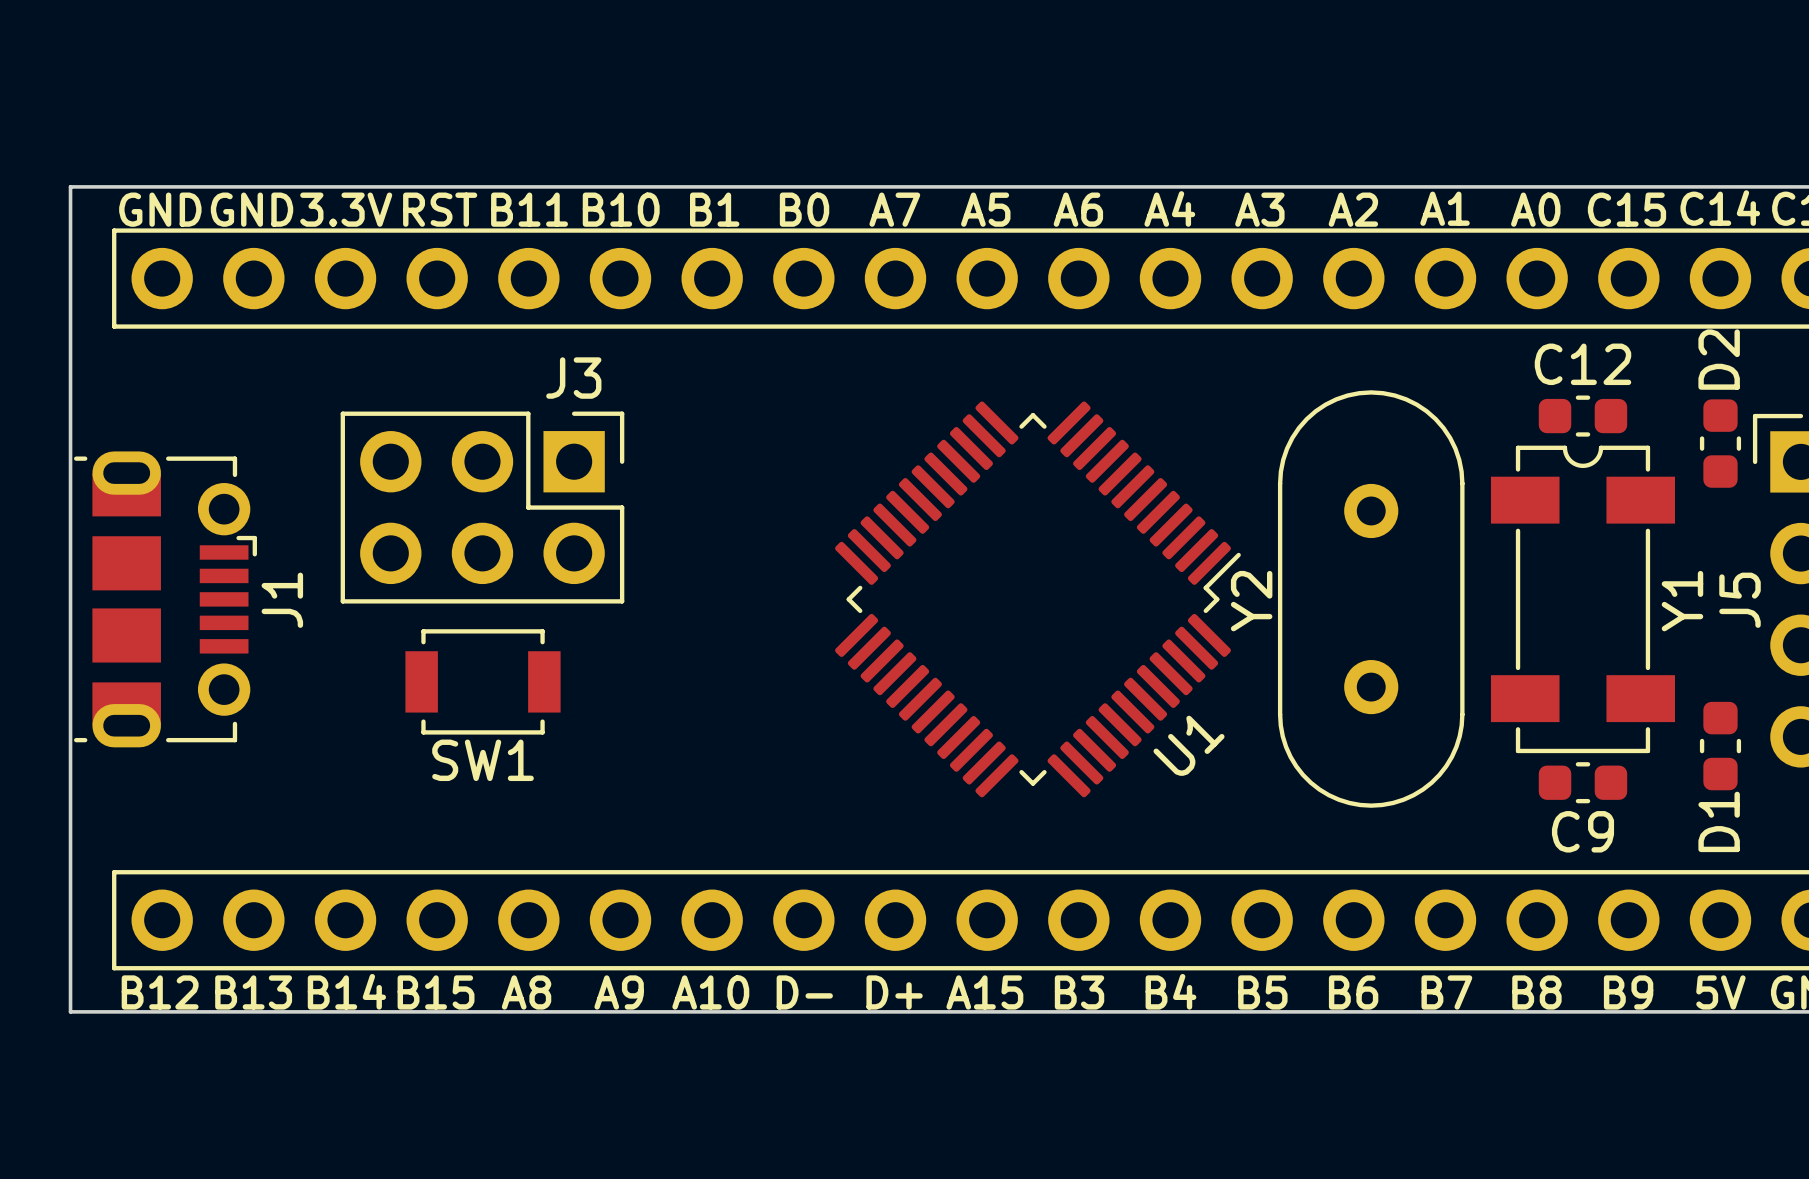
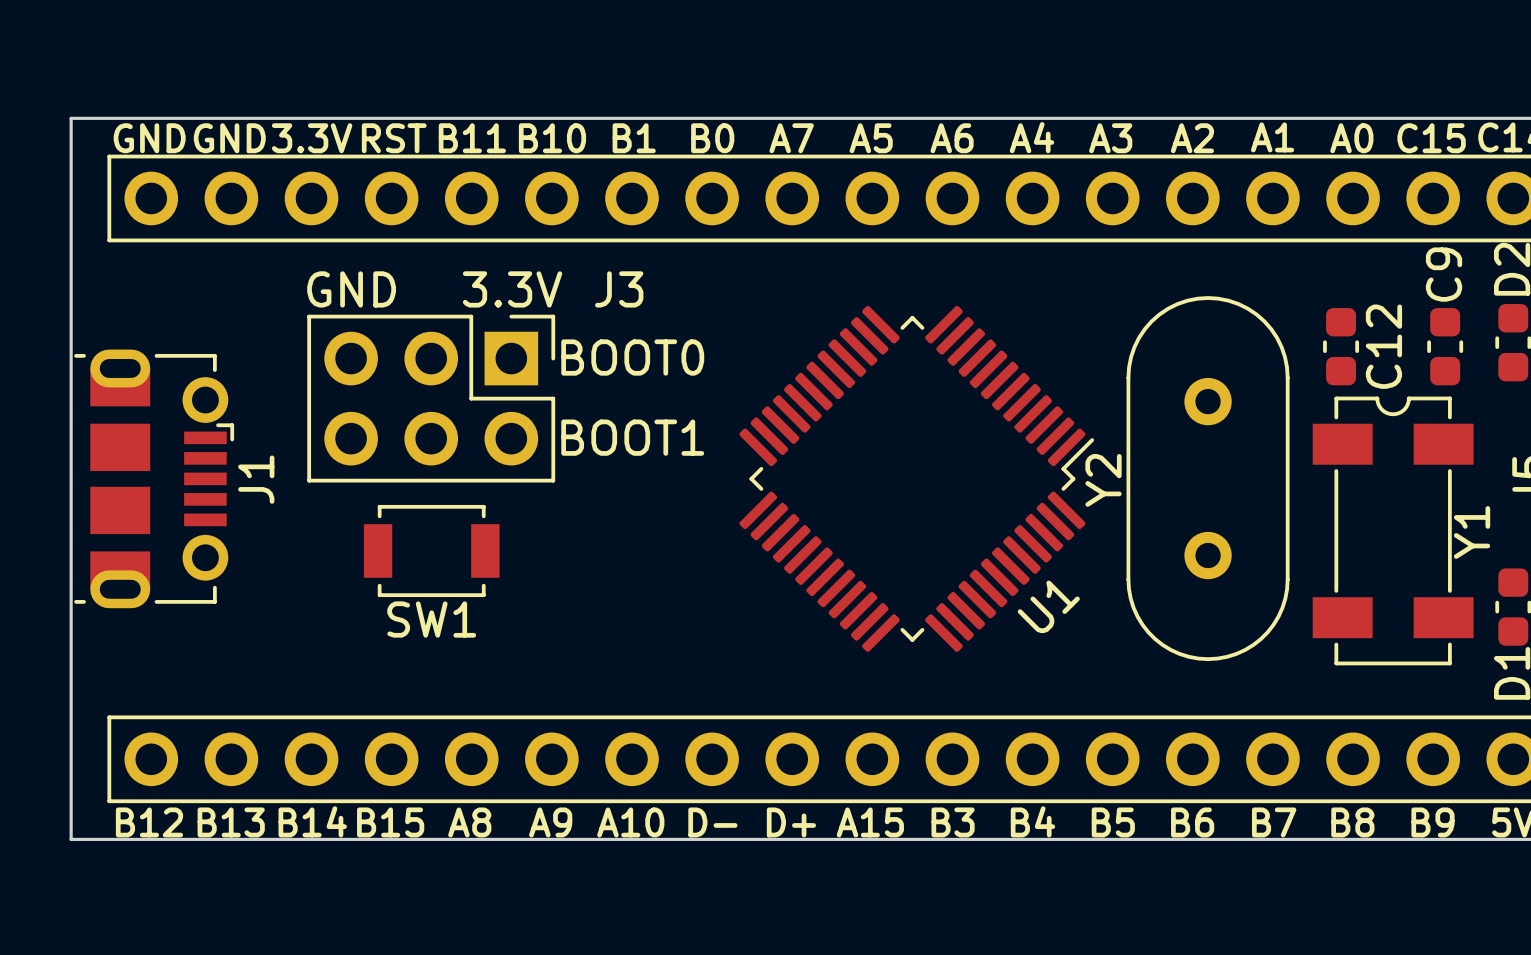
J3 name position: J3 (573, 378) -> J3 (619, 289)
text: none -> GND (351, 289)
text: none -> 3.3V (512, 289)
C12 rotation: 0° (1582, 416) -> 90° clockwise (1341, 346)
C12 position: (1582, 416) -> (1341, 346)
text: none -> BOOT0 (632, 357)
text: none -> BOOT1 (632, 437)
Y1 position: (1582, 599) -> (1393, 530)
Y1 name position: Y1 (1682, 601) -> Y1 (1472, 532)
C9 rotation: 0° (1582, 782) -> 90° clockwise (1445, 346)
C9 position: (1582, 782) -> (1445, 346)
C9 name position: C9 (1582, 831) -> C9 (1444, 274)

